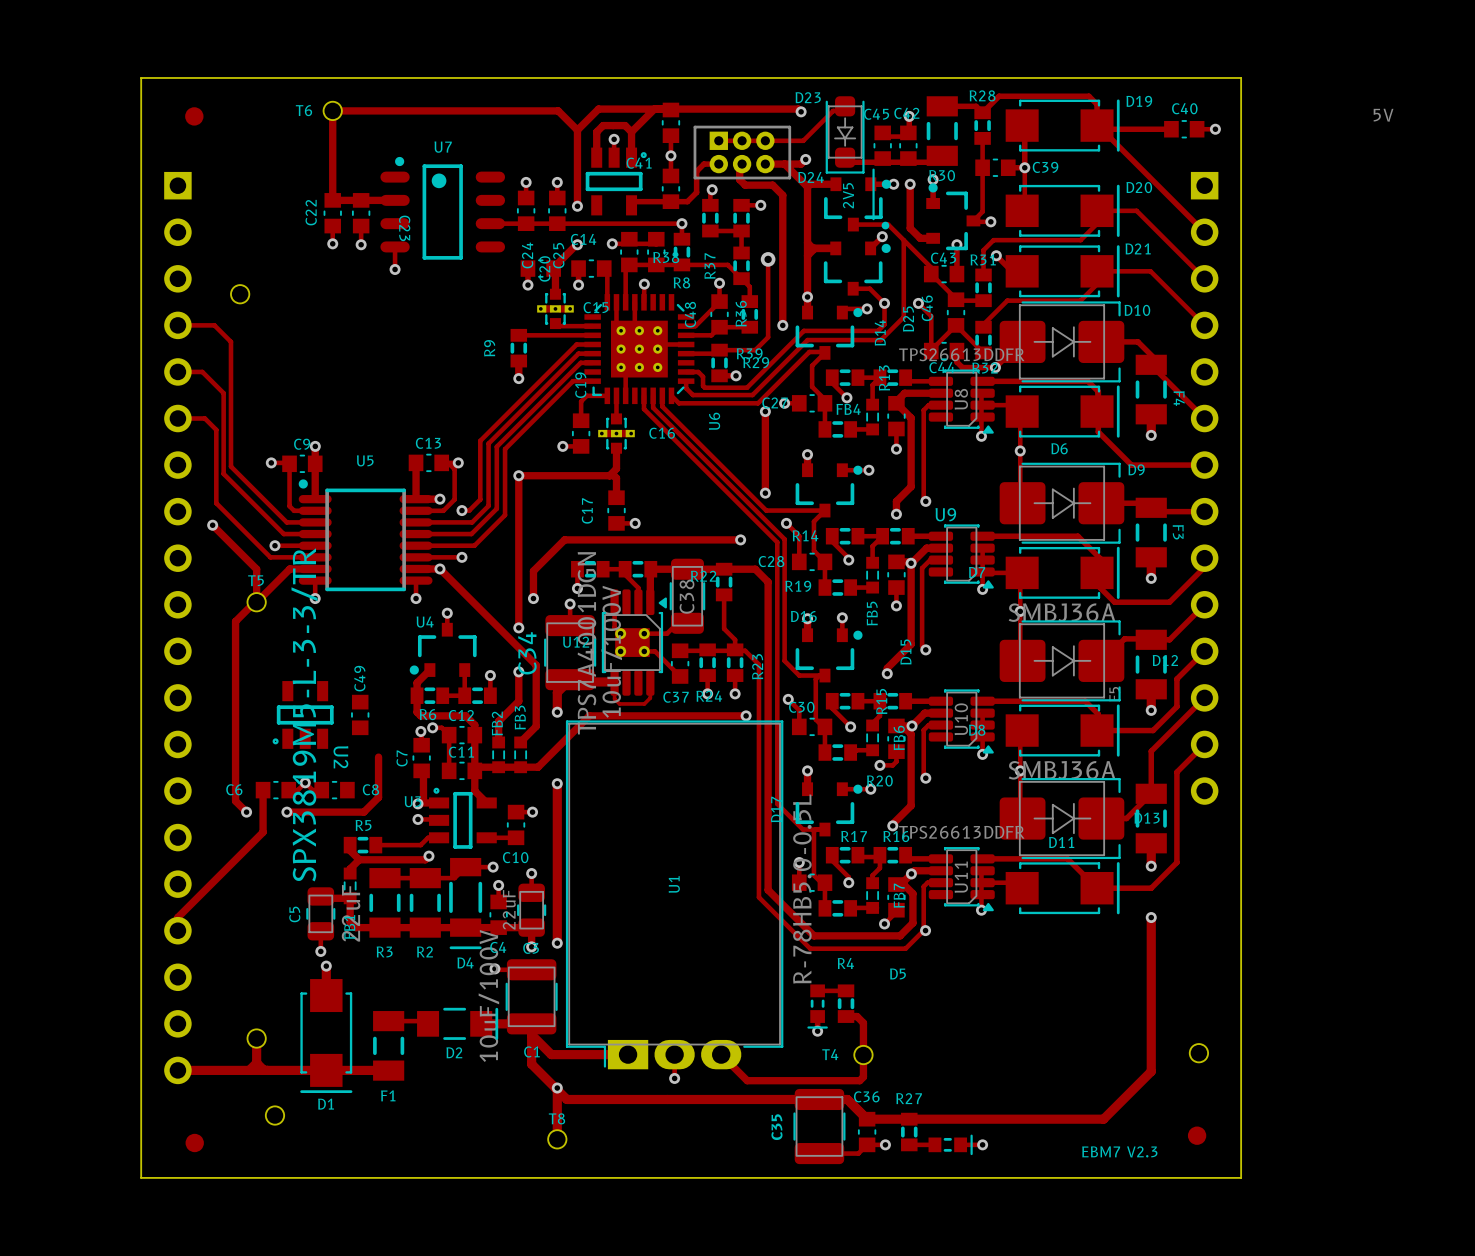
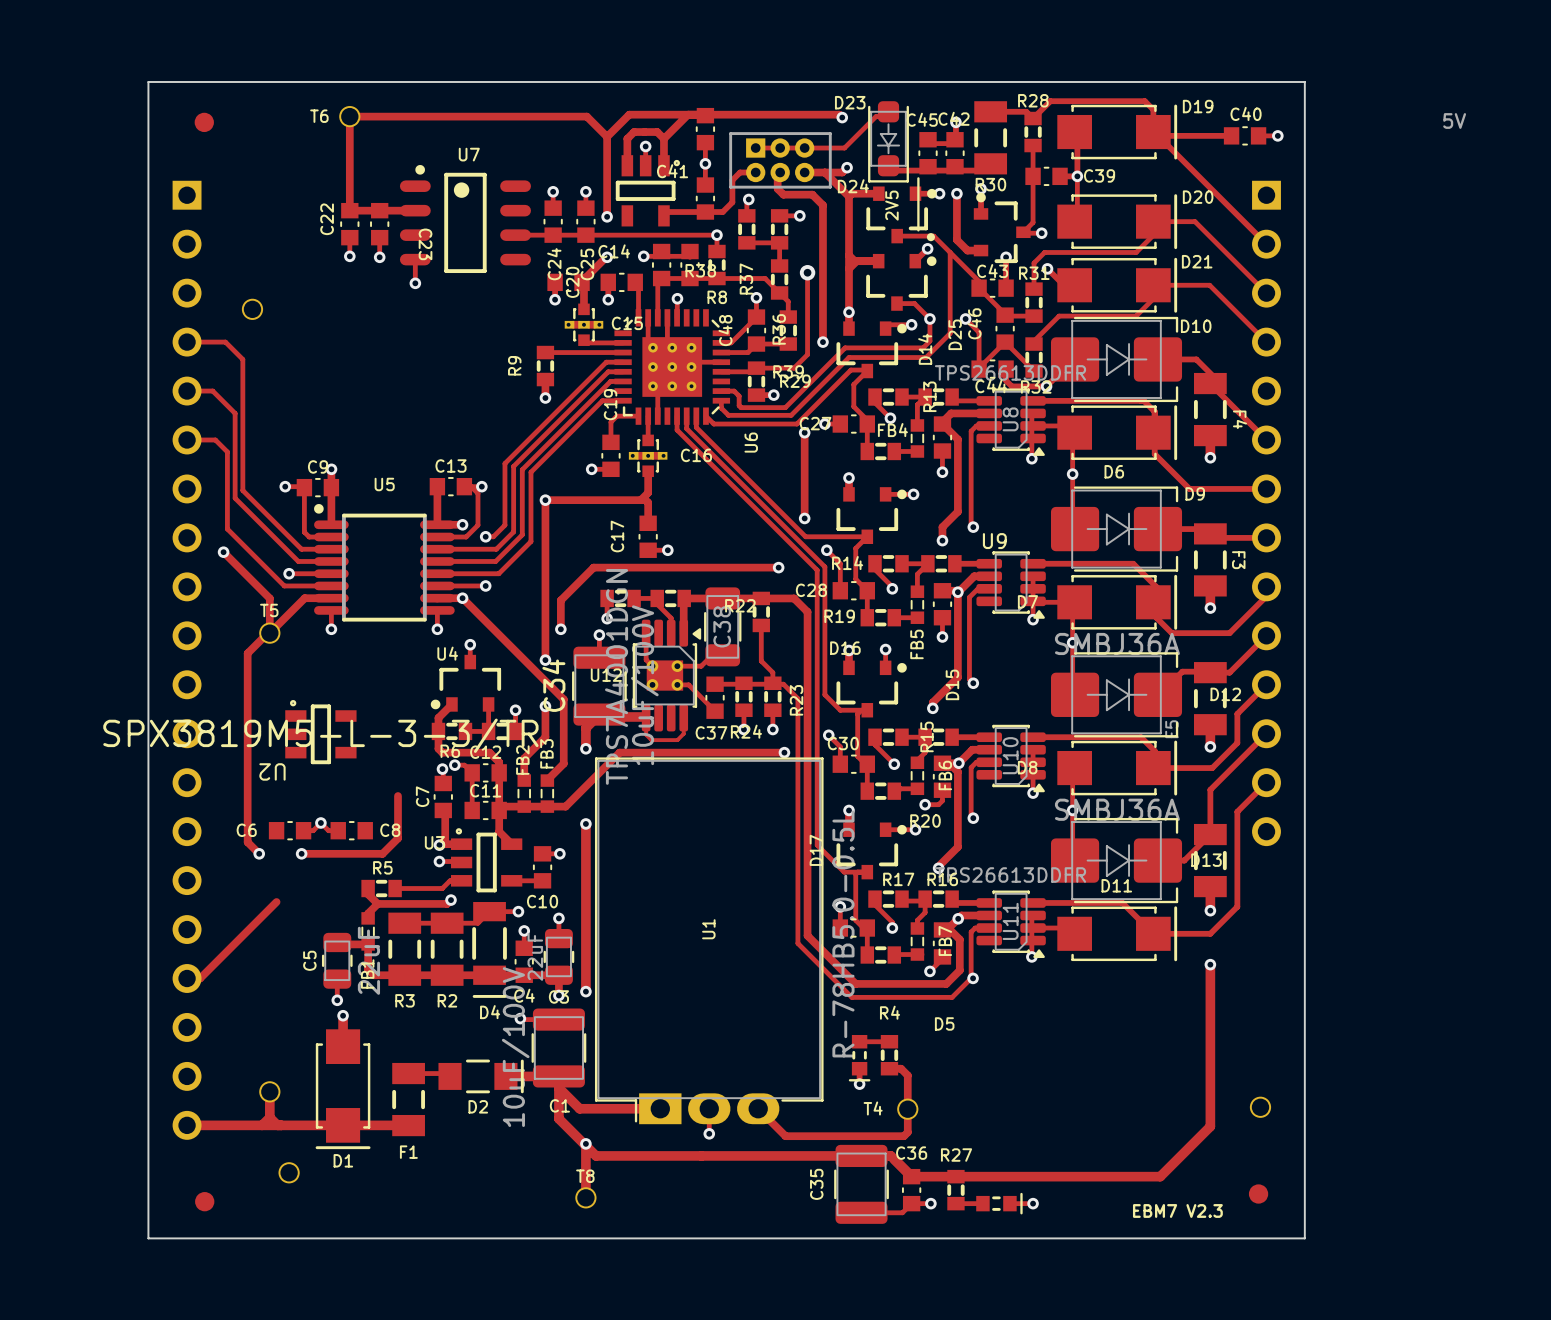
U2 rotation: 0° (303, 714) -> 90° clockwise (320, 732)
C49: (360, 714) -> none
track: (263, 790) (263, 832) (177, 917) (177, 930) -> (276, 902) (200, 978) (187, 978)

